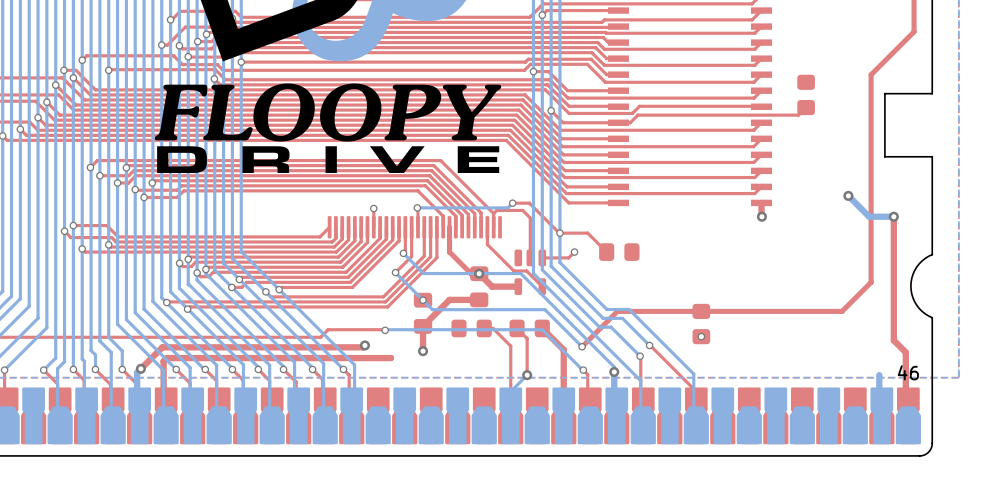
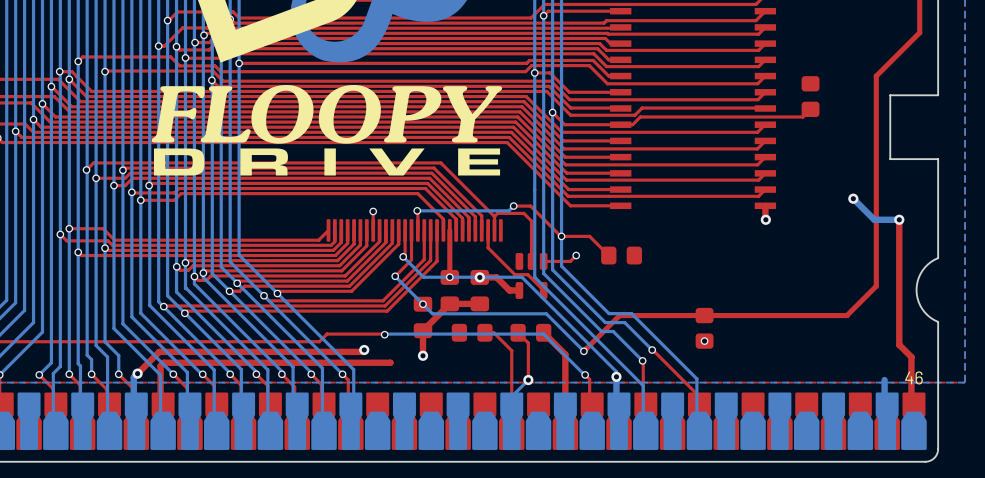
top track: (449, 252) (471, 273) (479, 273) (492, 286) (508, 286) -> (483, 277) (496, 277) (509, 290)
top track: none -> (449, 255) (449, 277)
via: none -> (449, 277)
part: none -> (449, 290)

